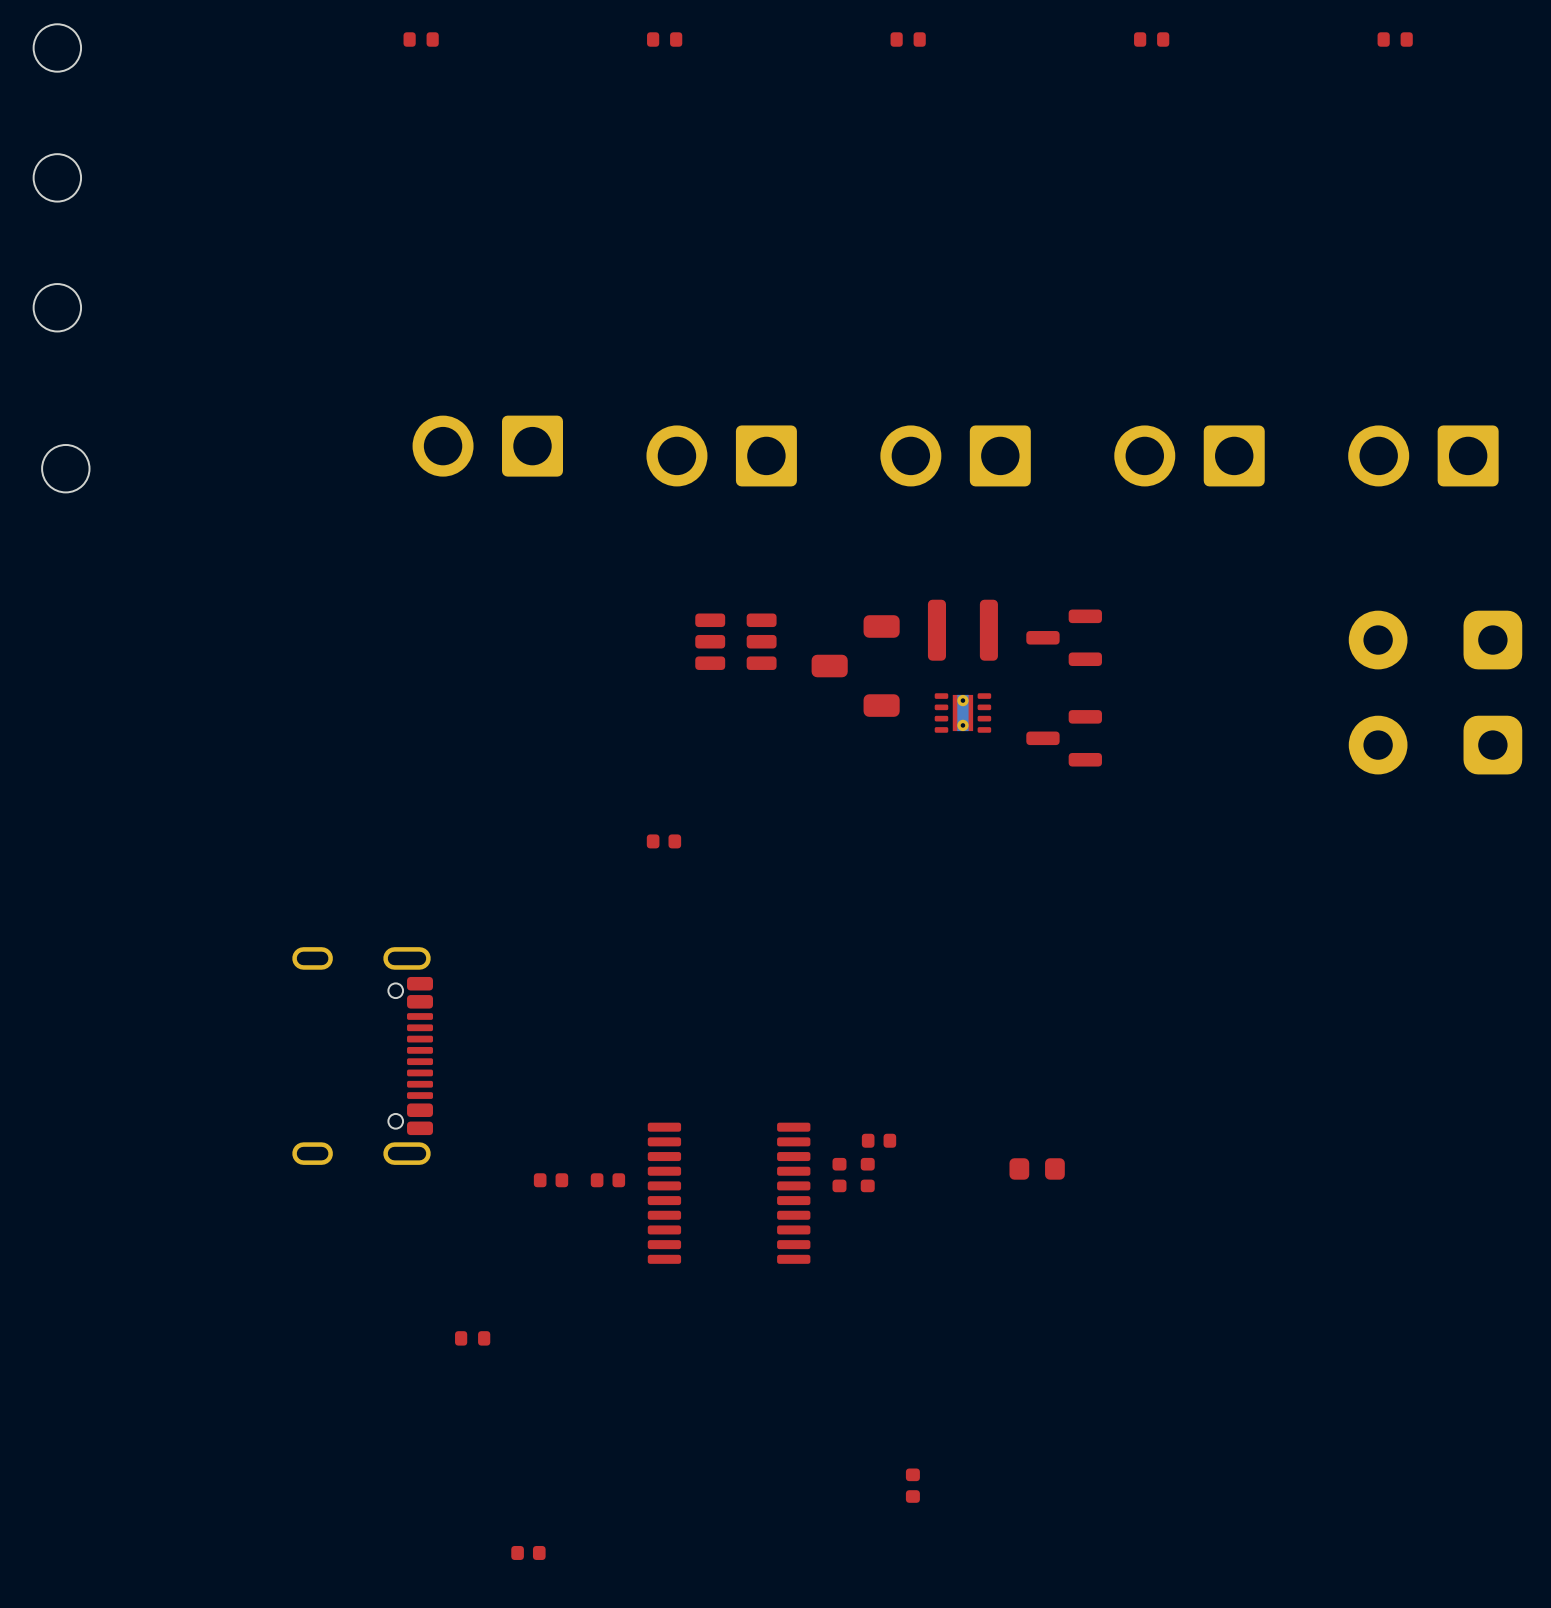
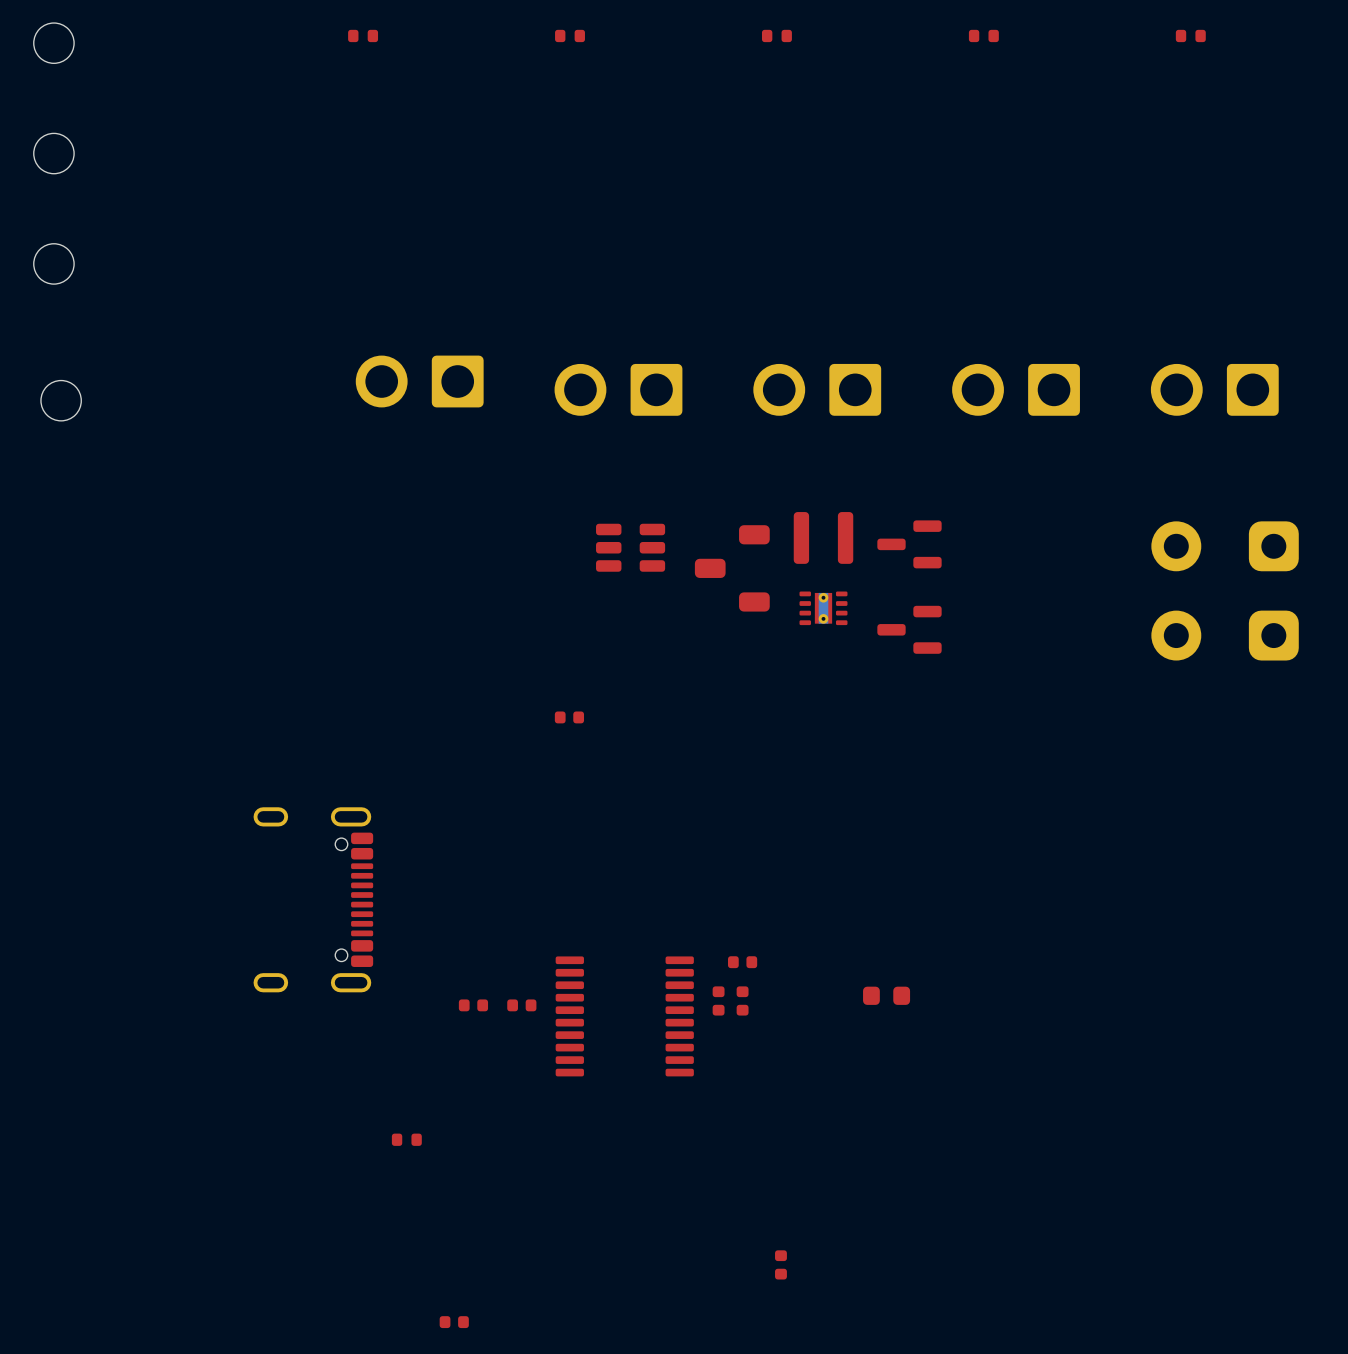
part position: (879, 1140) -> (742, 962)

